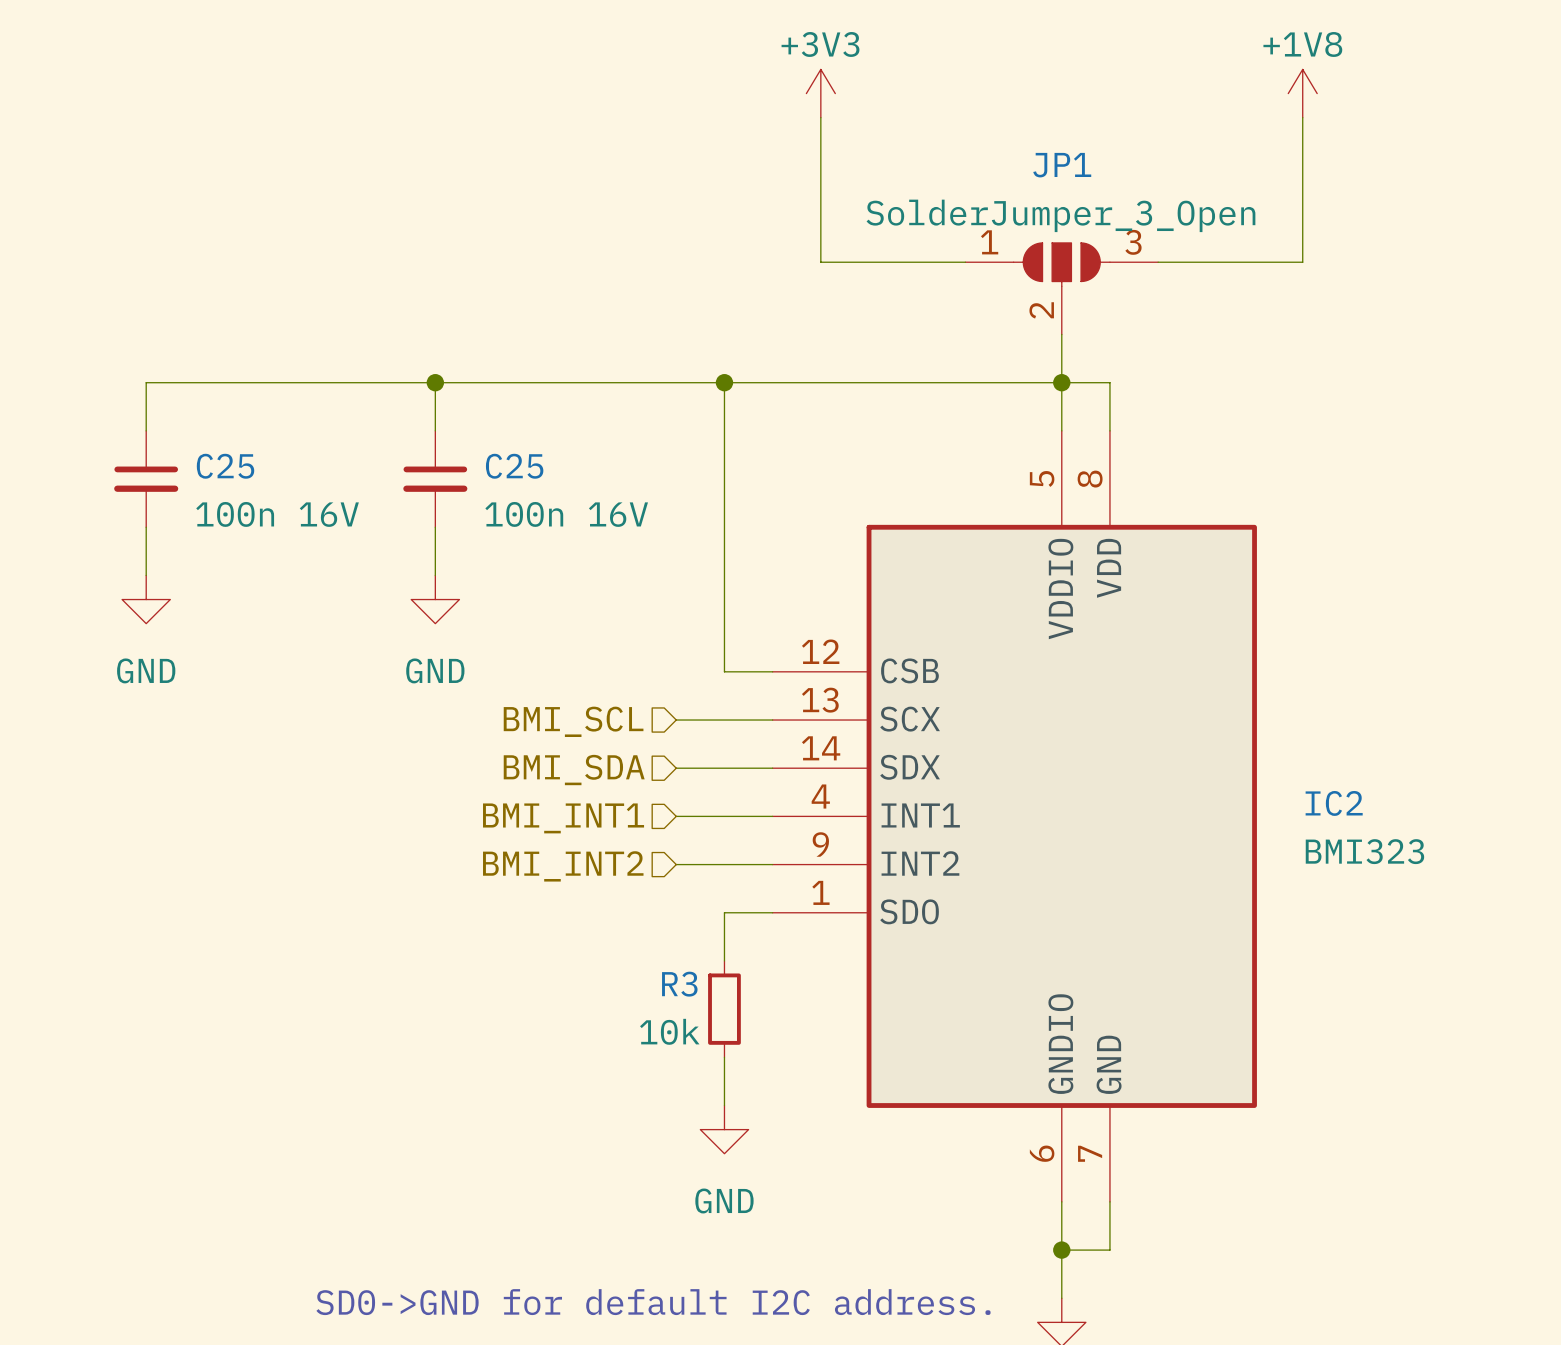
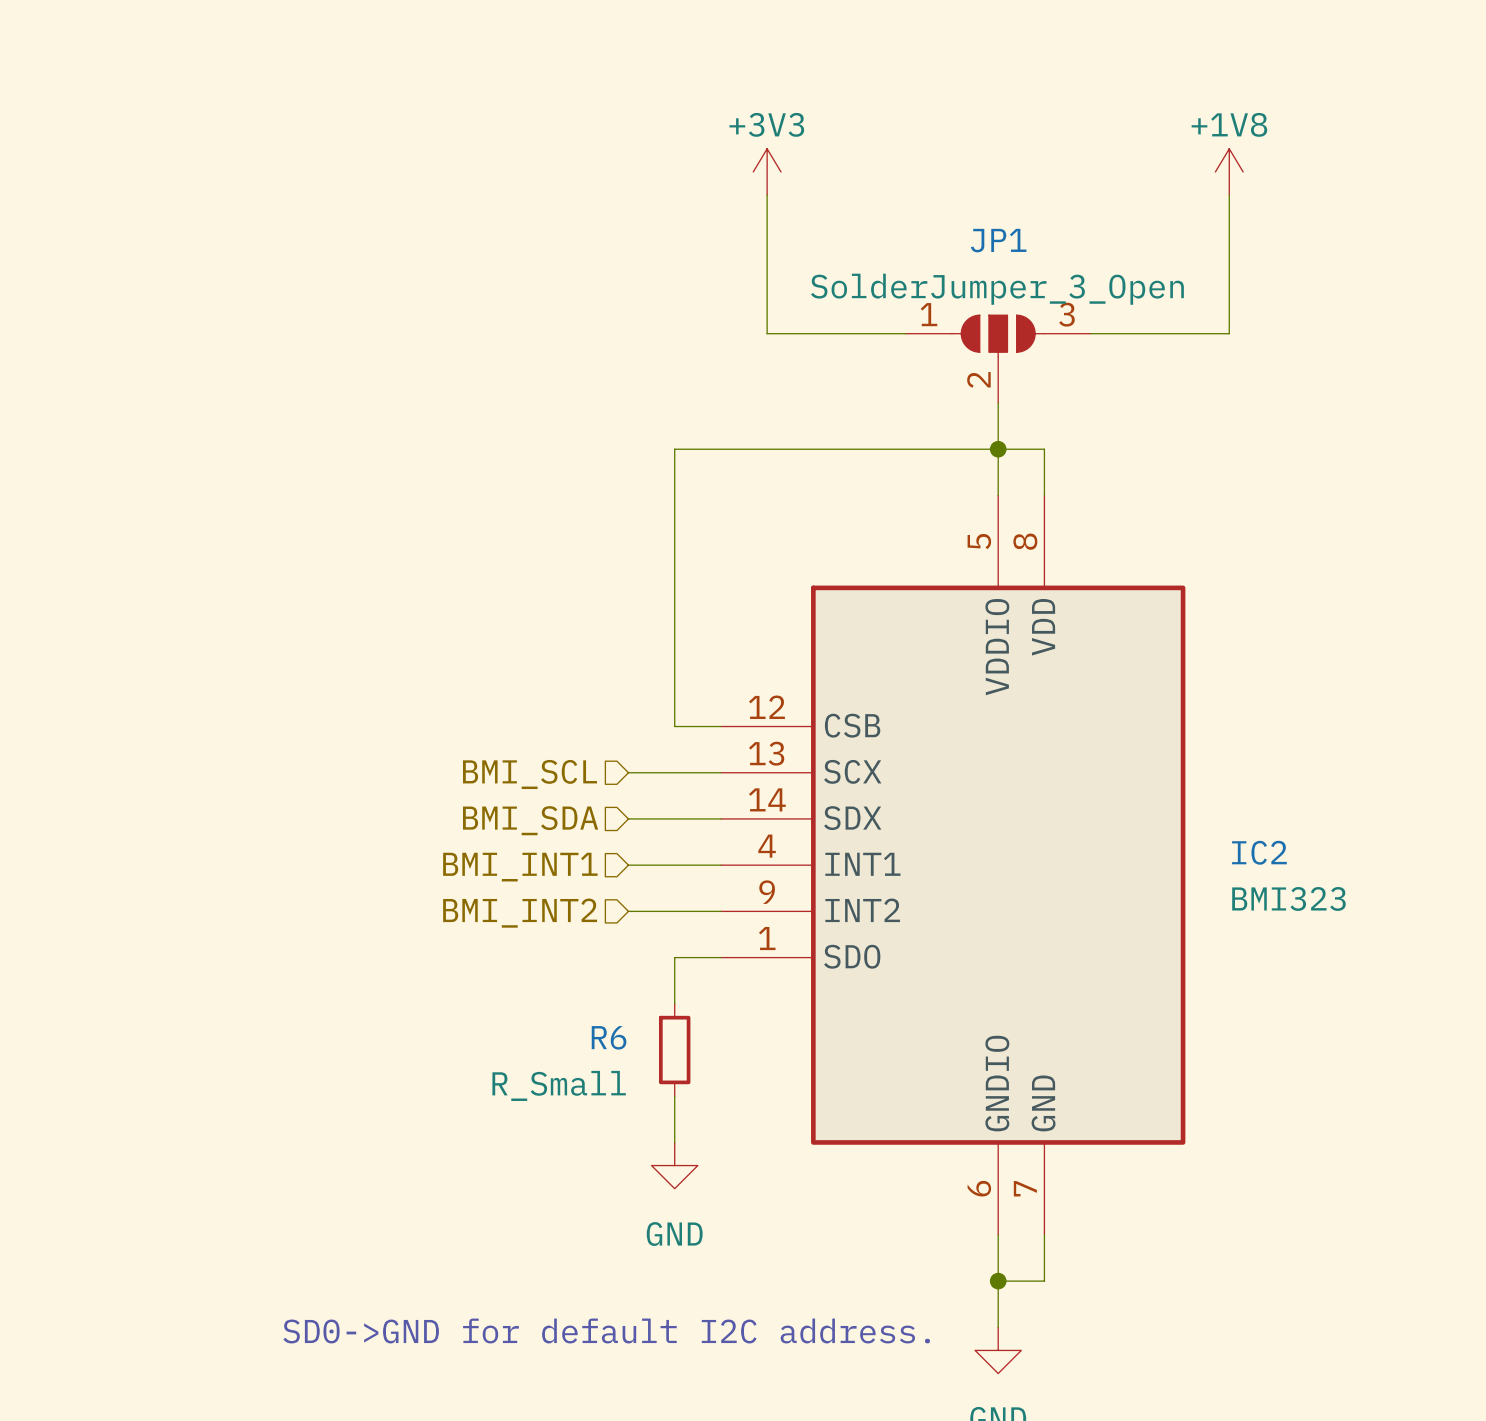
wire: (435, 382) (435, 430) -> none
junction: (435, 382) -> none
wire: (724, 382) (146, 382) (146, 430) -> none
junction: (724, 382) -> none
C25: 100n 16V (146, 479) -> none
C25: 100n 16V (435, 479) -> none
wire: (146, 527) (146, 575) -> none
wire: (435, 527) (435, 575) -> none
power symbol: GND (146, 599) -> none
power symbol: GND (435, 599) -> none
R3 name: R3 (679, 984) -> R6 (609, 1037)
R3 value: 10k (669, 1031) -> R_Small (559, 1085)

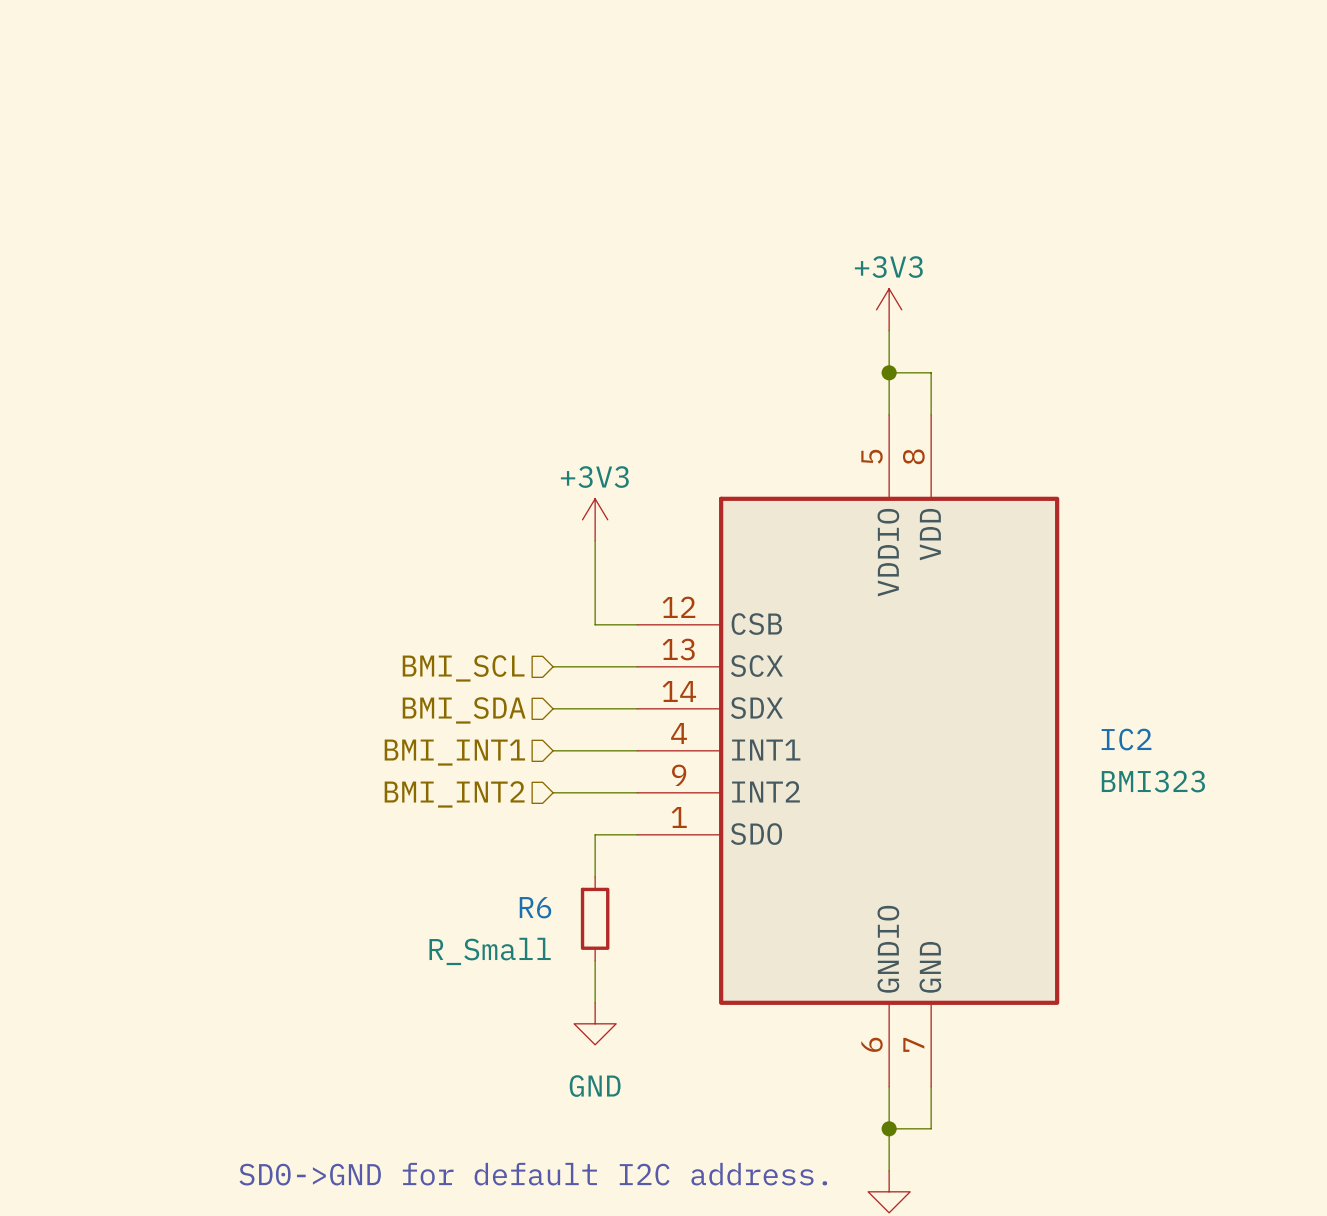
power symbol: +3V3 (767, 171) -> none
power symbol: +1V8 (1229, 171) -> none
wire: (767, 195) (767, 333) (905, 333) -> none
wire: (1229, 195) (1229, 333) (1090, 333) -> none
JP1: SolderJumper_3_Open (998, 359) -> none
power symbol: none -> +3V3 (889, 309)
wire: (998, 449) (674, 449) (674, 634) -> none
power symbol: none -> +3V3 (595, 519)

